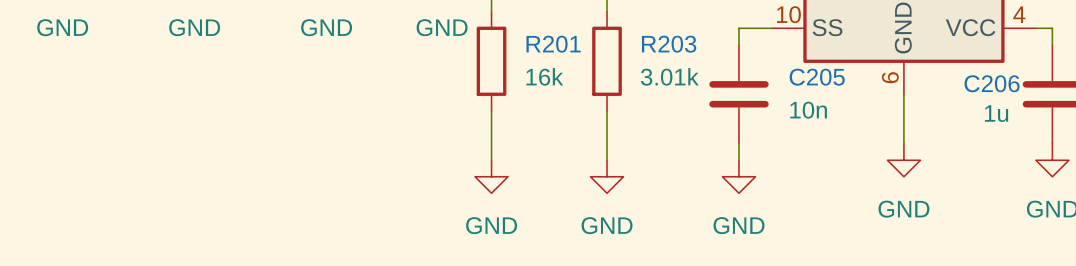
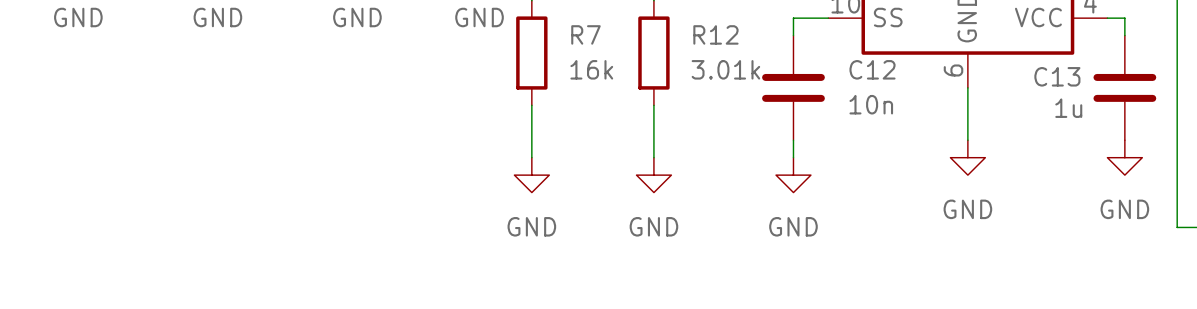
R201 name: R201 (553, 44) -> R7 (585, 34)
R203 name: R203 (669, 44) -> R12 (715, 34)
C205 name: C205 (817, 77) -> C12 (872, 69)
C206 name: C206 (992, 83) -> C13 (1057, 76)

